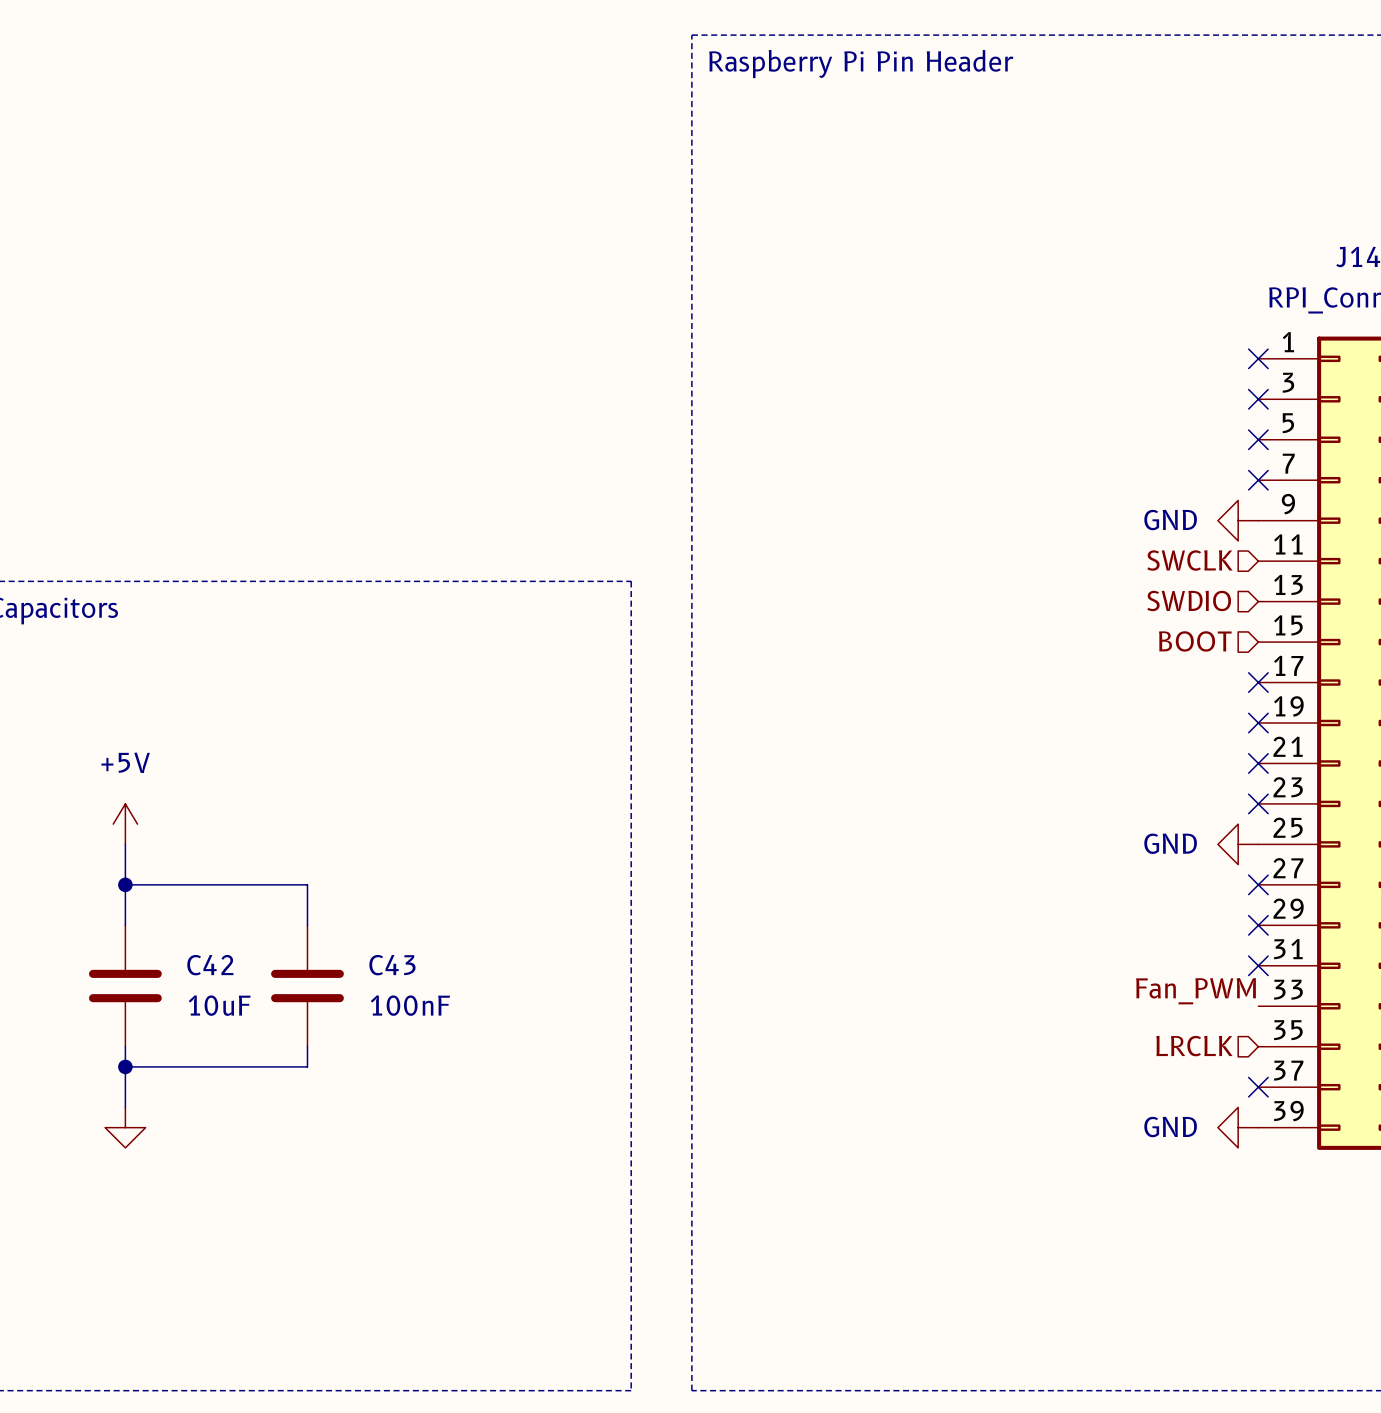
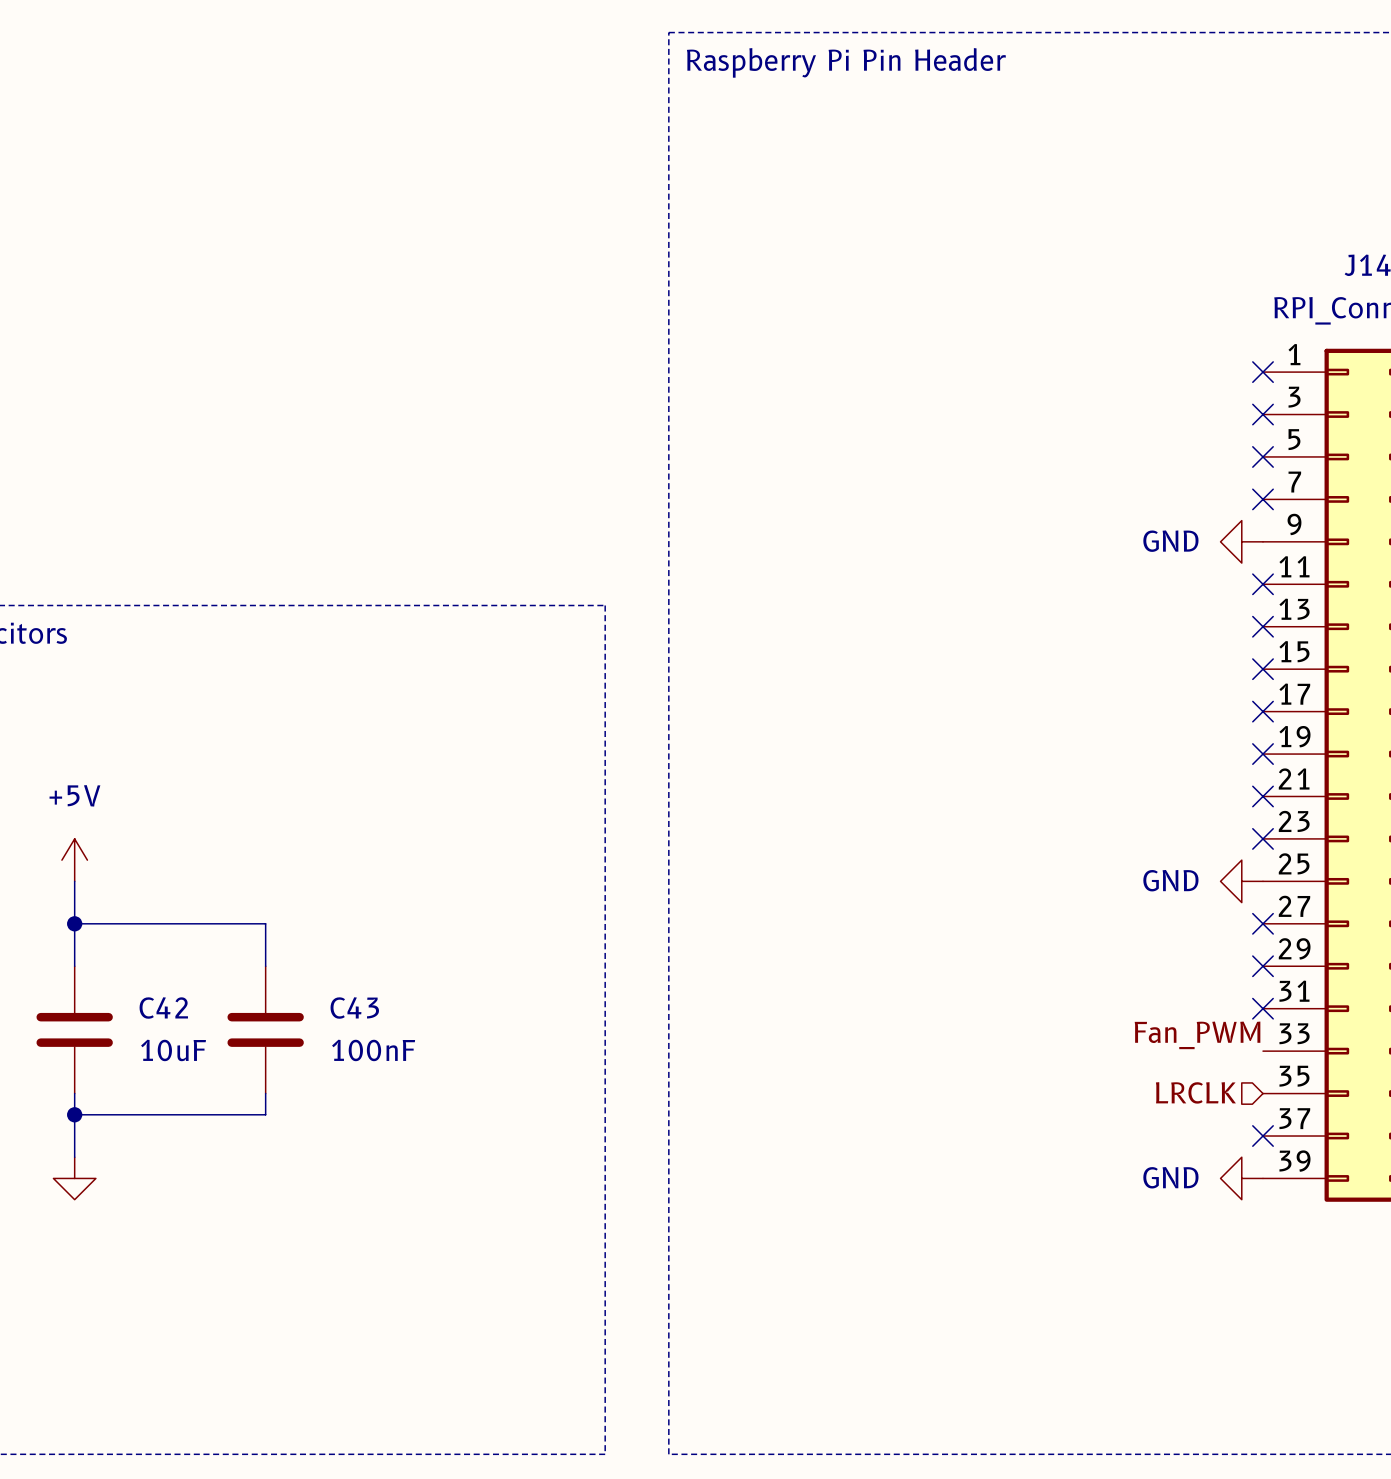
hierarchical label: SWCLK (1189, 560) -> none
no-connect mark: none -> (1263, 584)
hierarchical label: SWDIO (1189, 600) -> none
no-connect mark: none -> (1263, 626)
hierarchical label: BOOT (1195, 641) -> none
no-connect mark: none -> (1263, 669)

